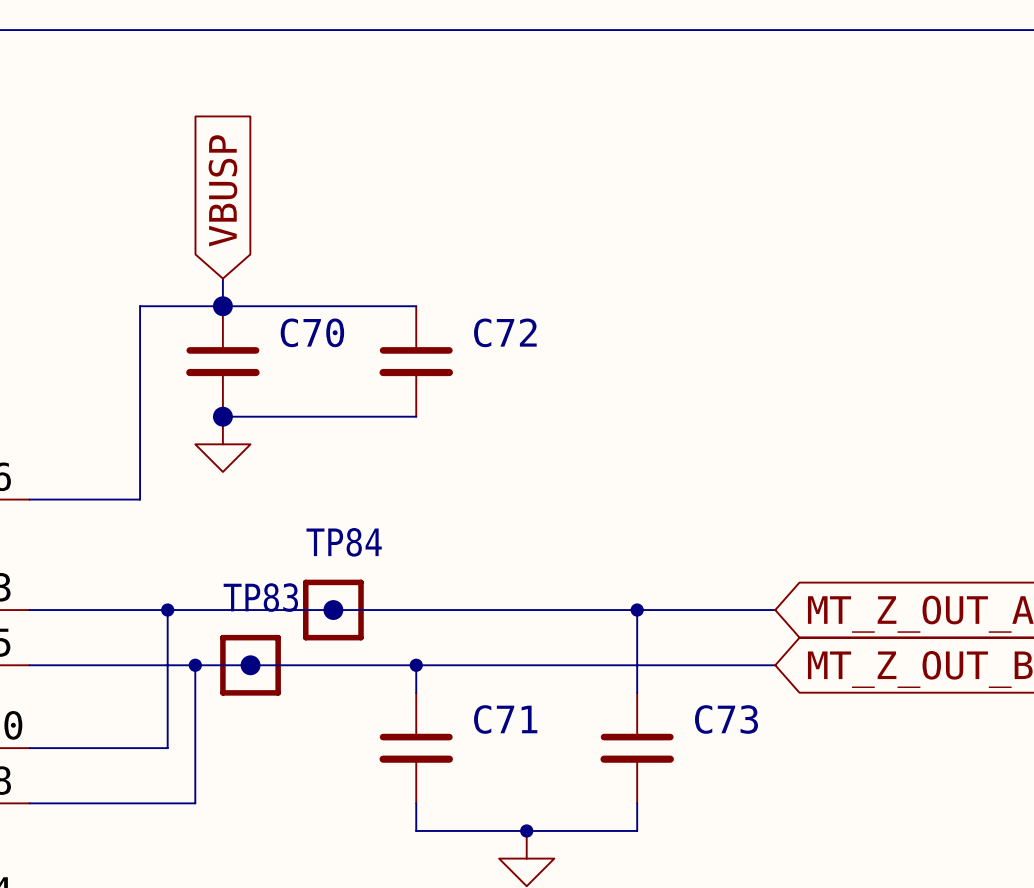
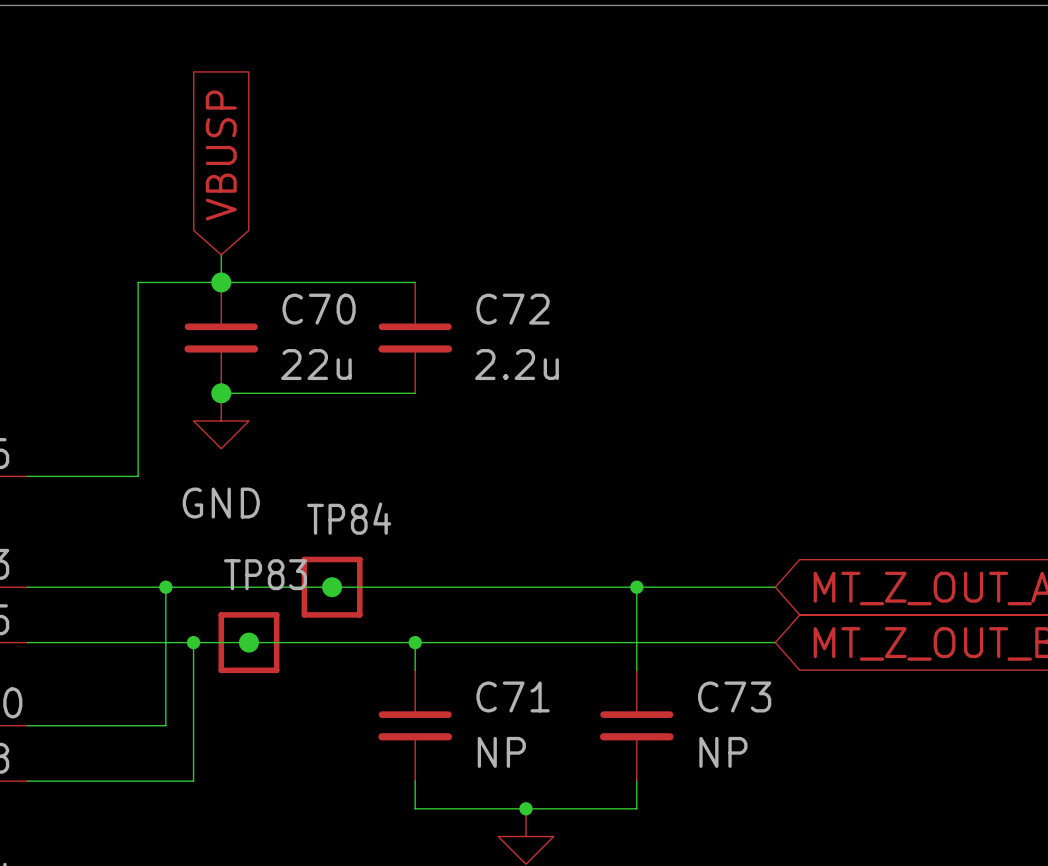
C70 value: none -> 22u (316, 364)
C72 value: none -> 2.2u (516, 364)
power symbol text: none -> GND (221, 503)
C71 value: none -> NP (501, 752)
C73 value: none -> NP (723, 752)

